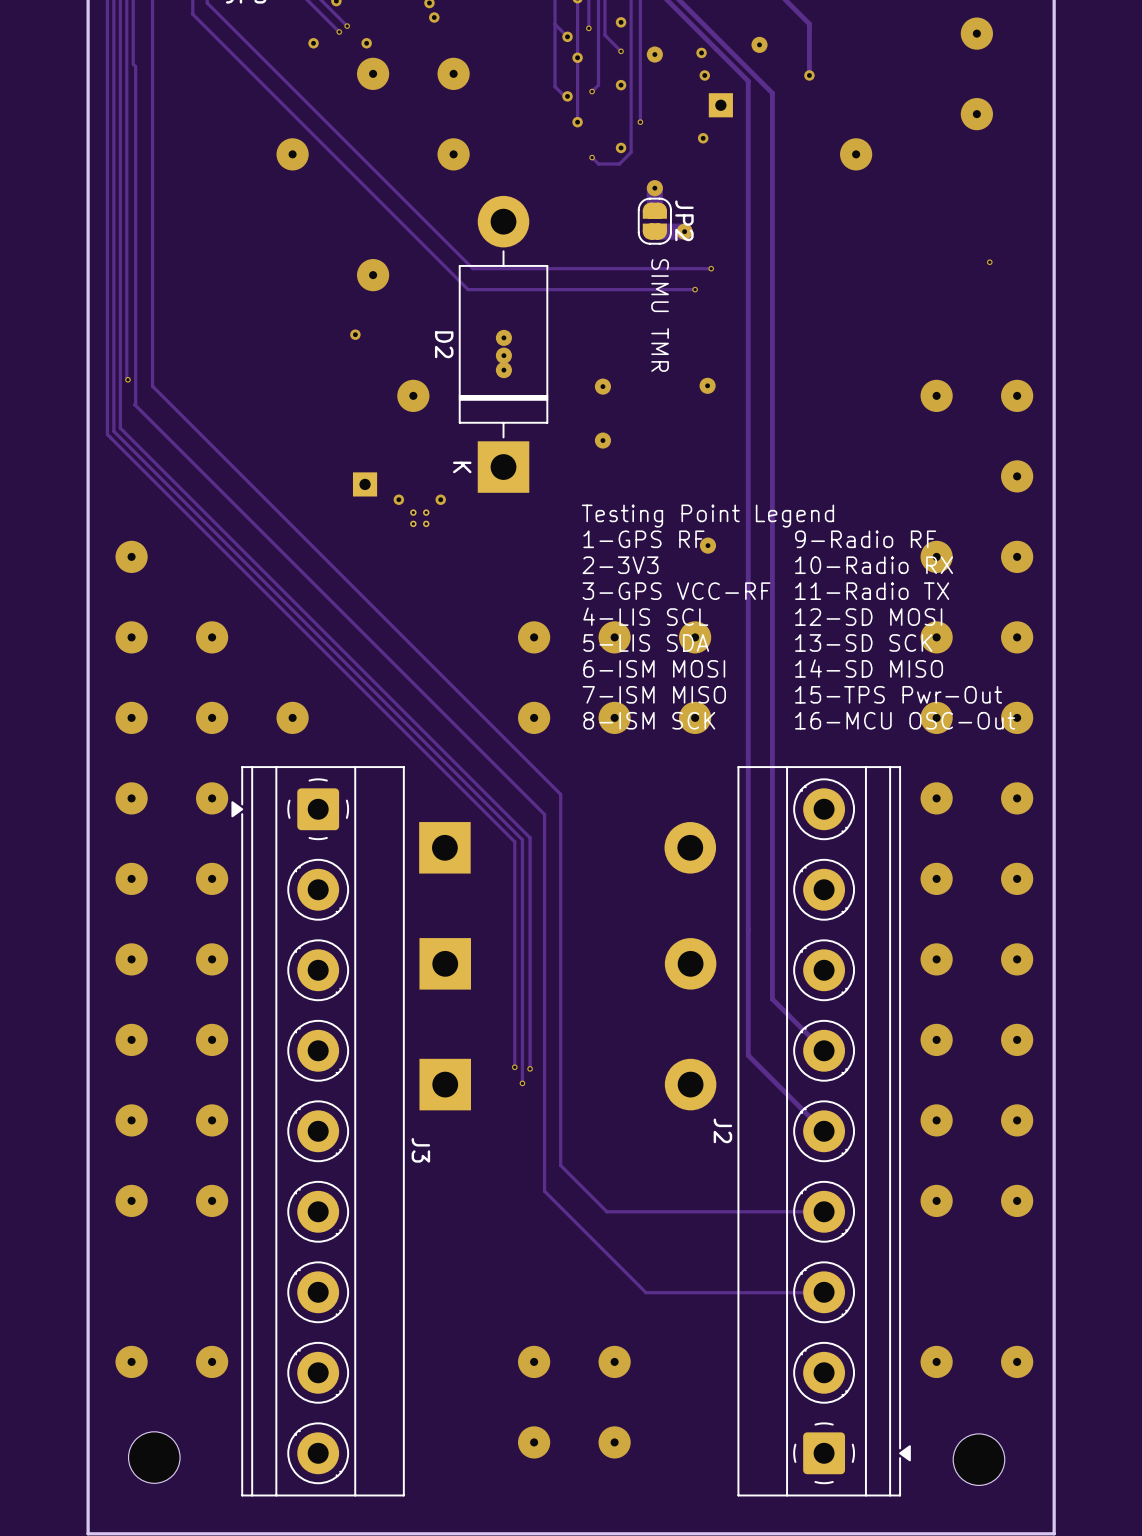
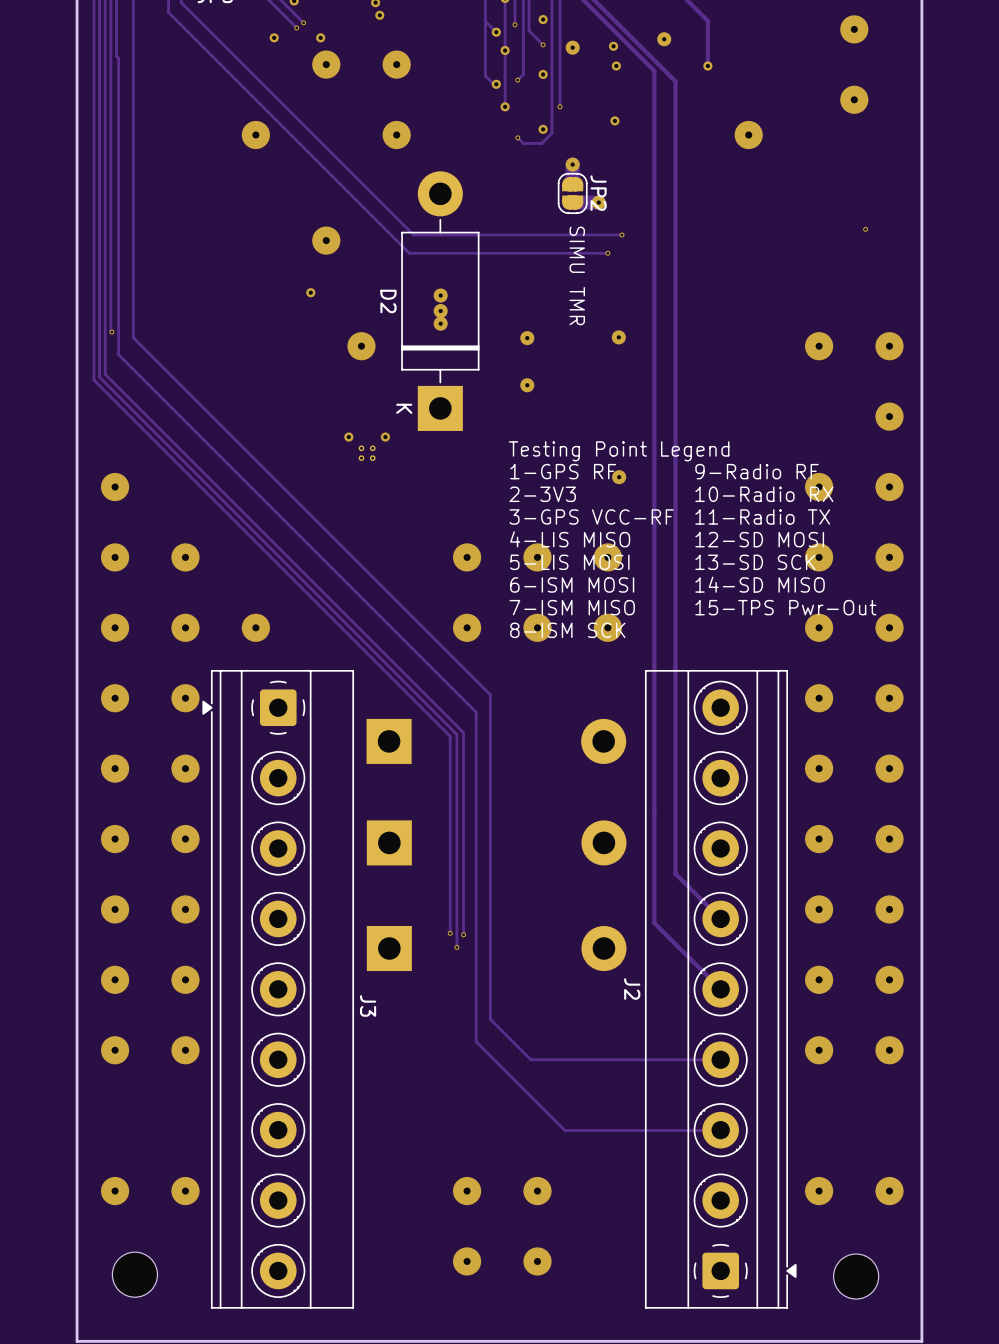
part: (720, 105) -> none
part: (365, 484) -> none
text: 4-LIS SCL (645, 616) -> 4-LIS MISO (570, 539)
text: 5-LIS SDA (646, 642) -> 5-LIS MOSI (569, 562)
text: 16-MCU OSC-Out (905, 720) -> none

